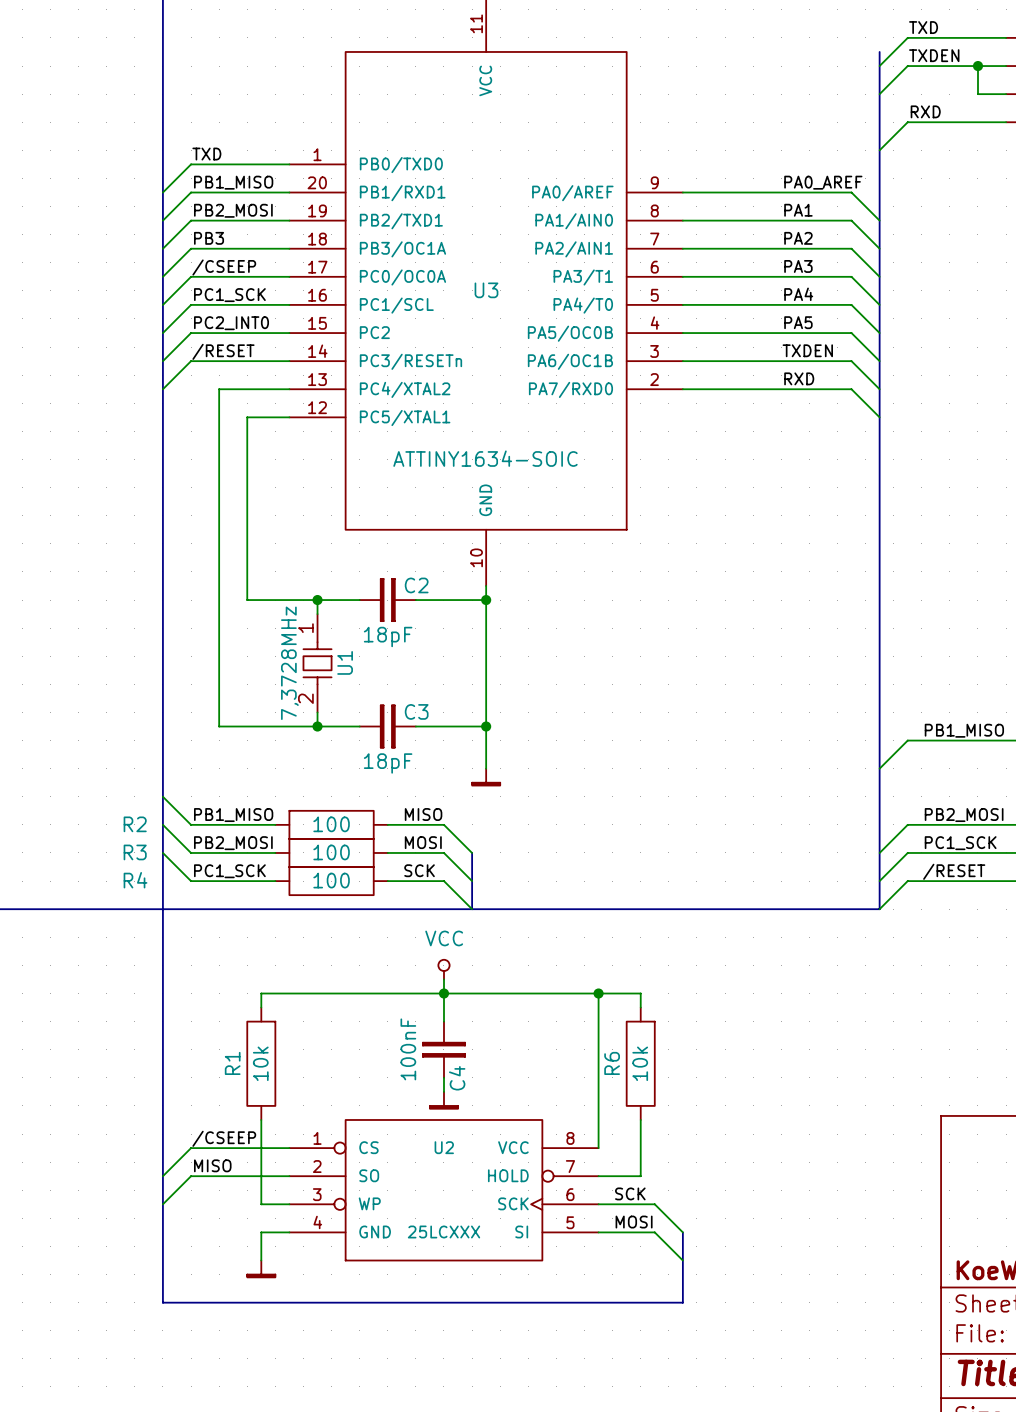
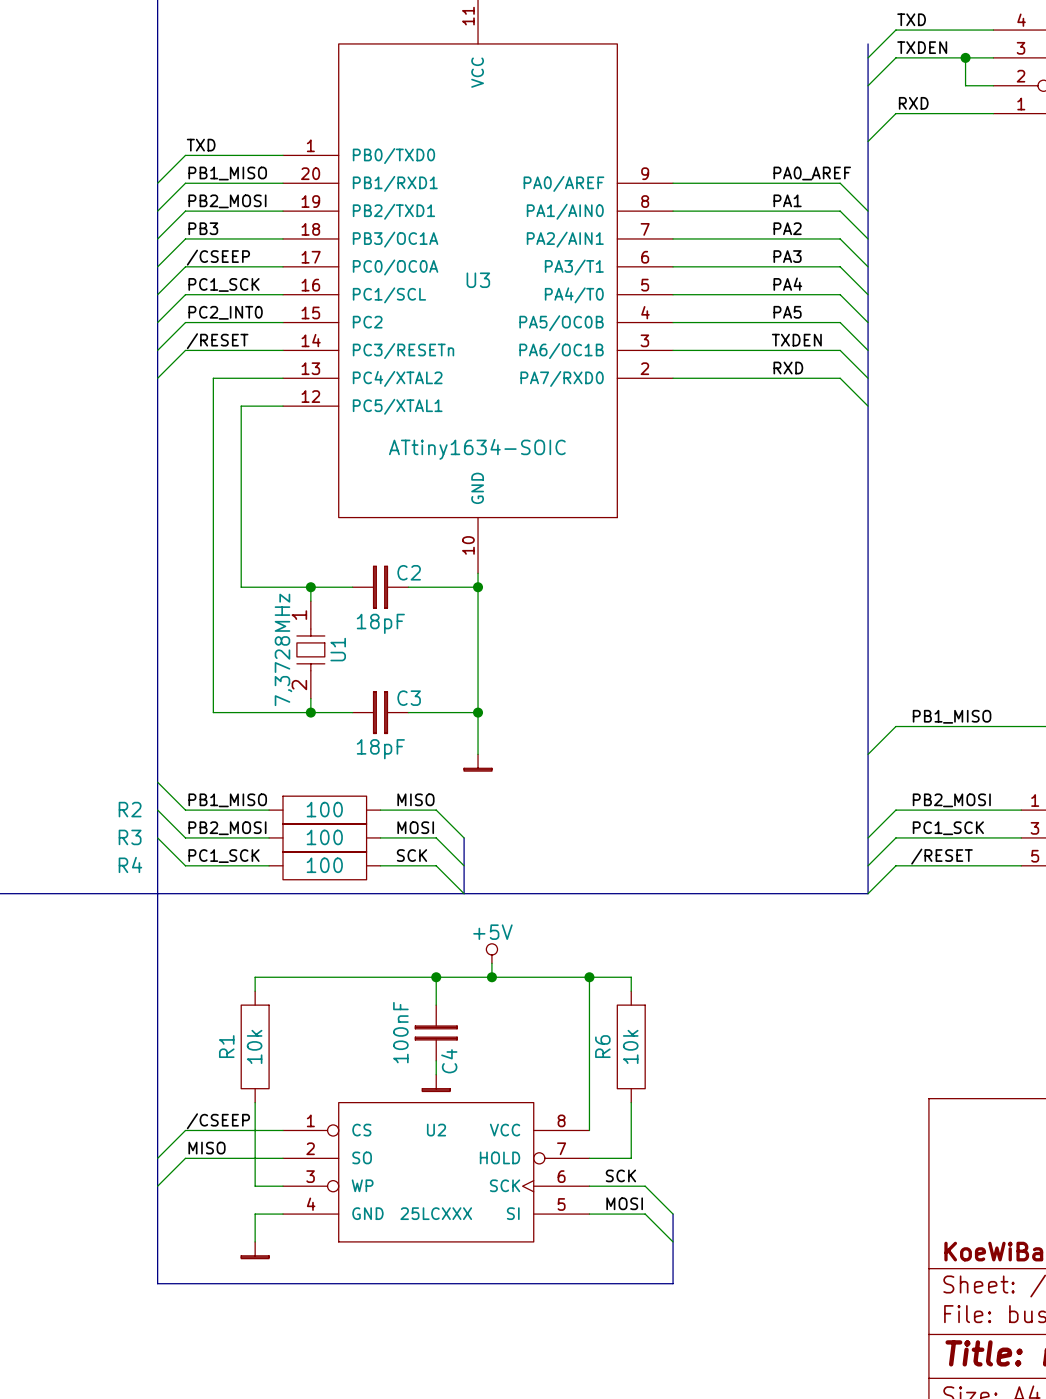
U3 value: ATTINY1634-SOIC (485, 458) -> ATtiny1634-SOIC (477, 449)
power symbol: VCC (443, 969) -> none
power symbol: none -> +5V (491, 953)
wire: (443, 979) (443, 993) -> (491, 963) (491, 977)
junction: none -> (491, 977)

